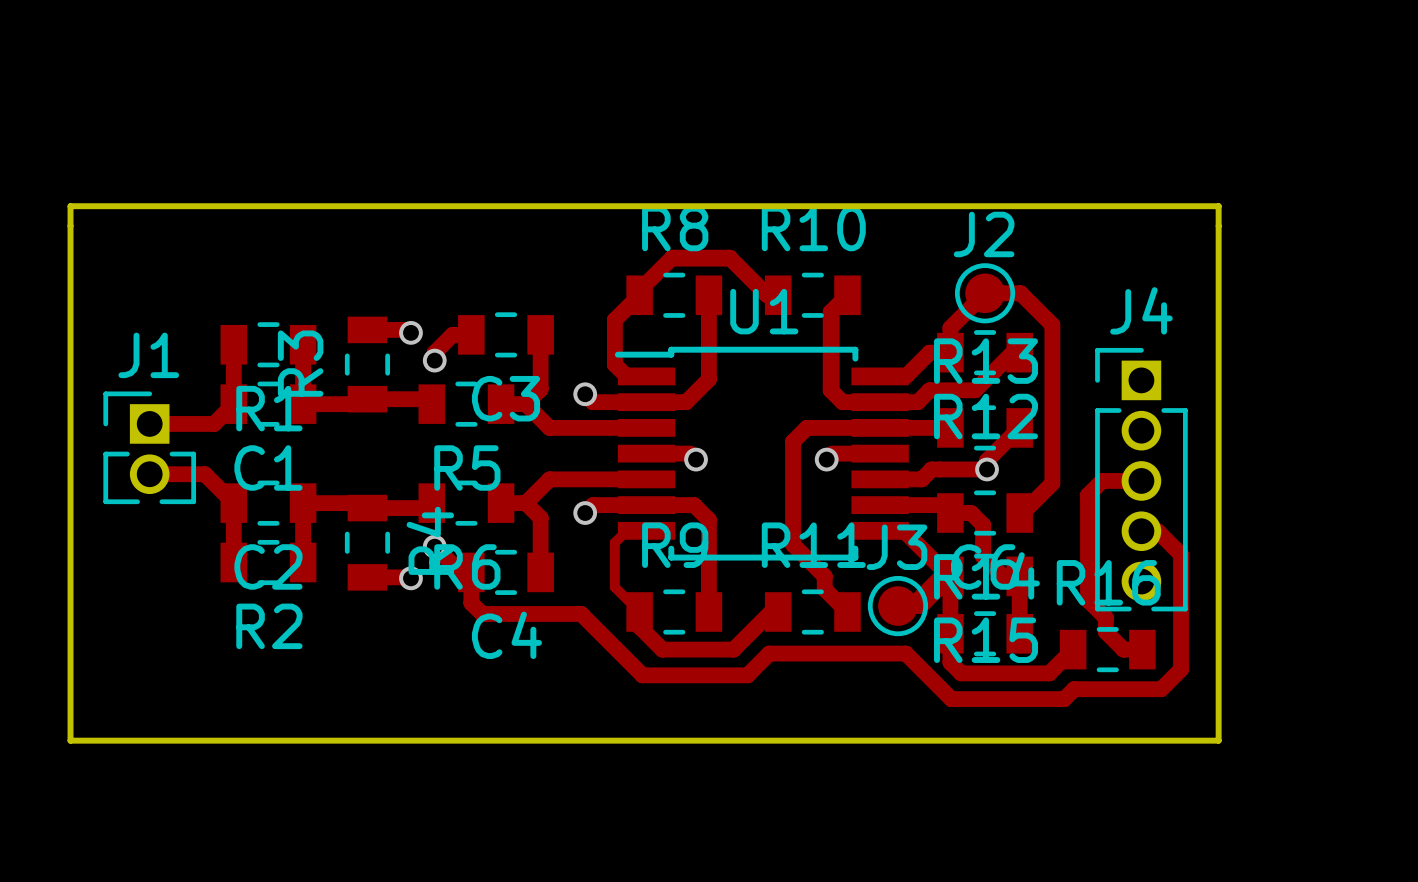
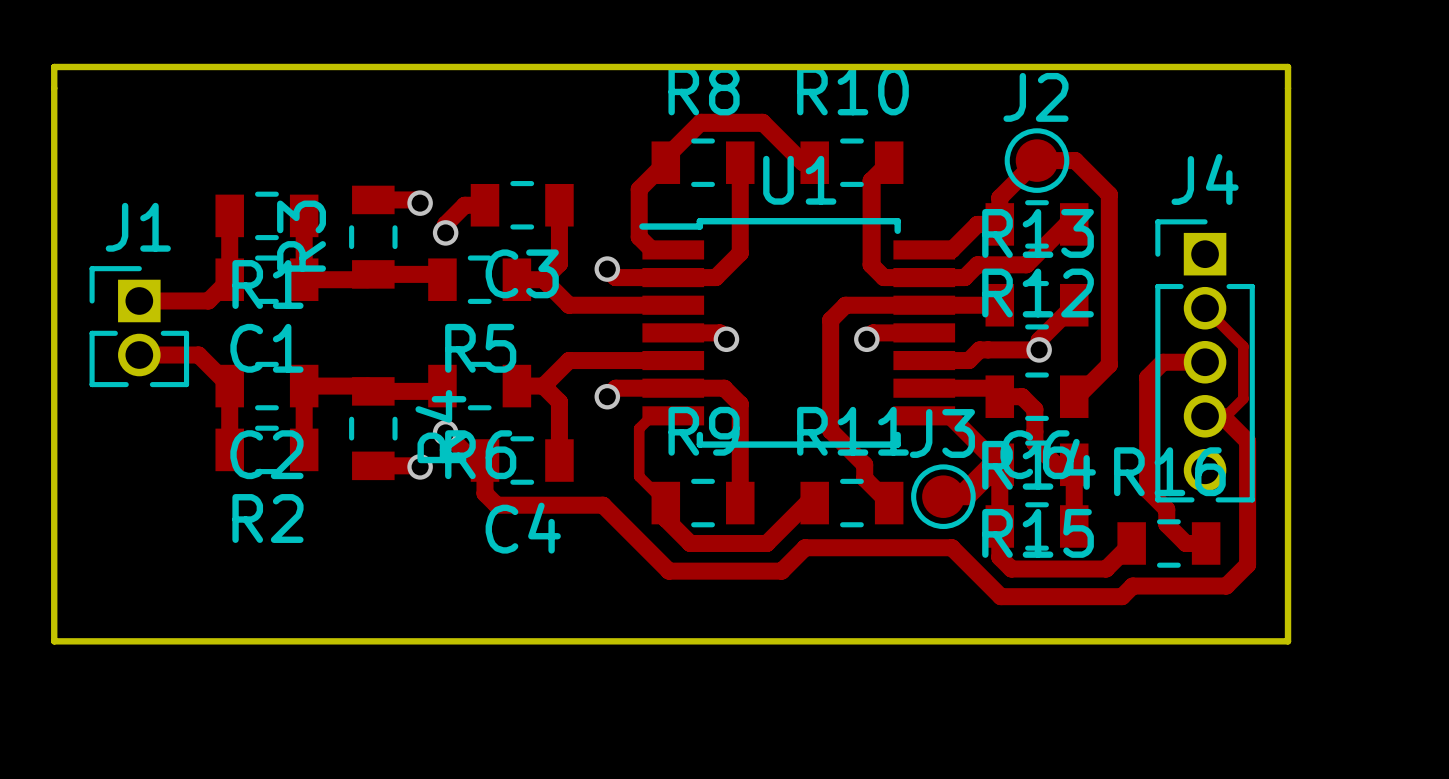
track: none -> (1205, 308) (1243, 346) (1243, 398) (1225, 416)

